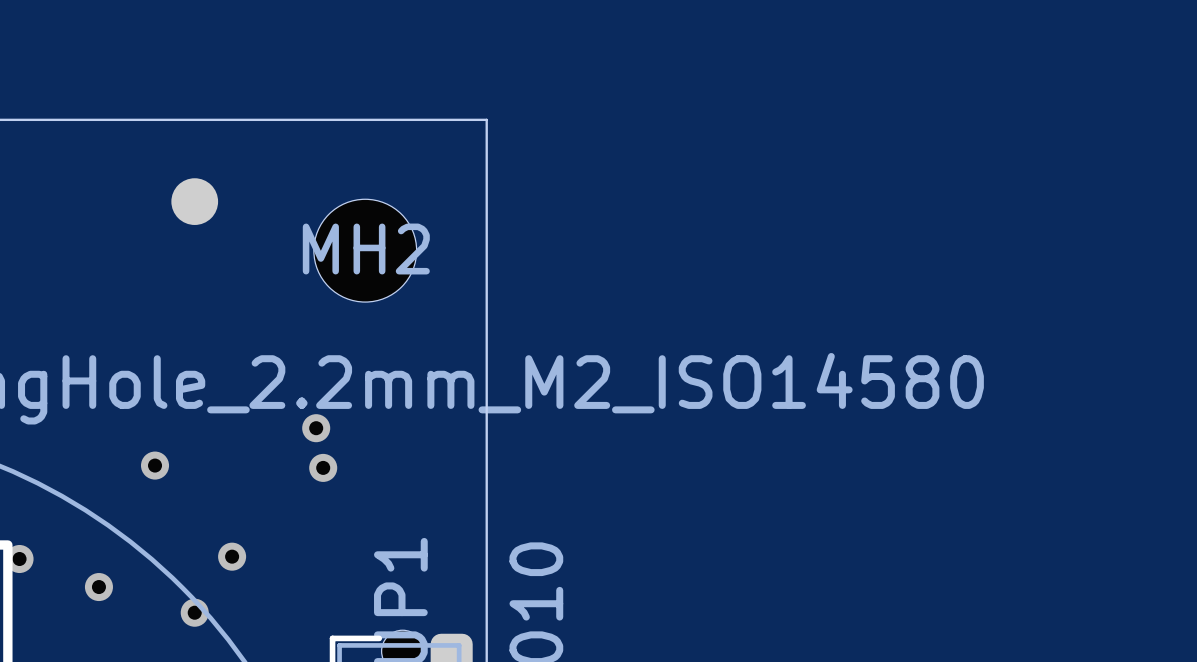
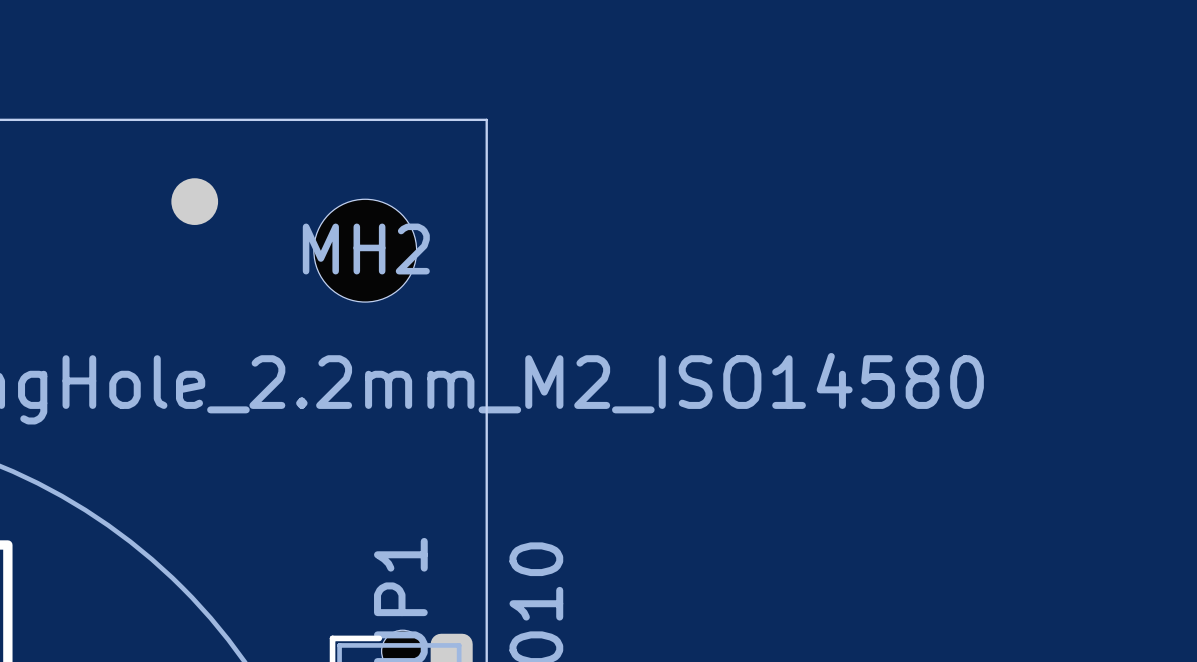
via: (316, 428) -> none
via: (155, 465) -> none
via: (323, 467) -> none
via: (232, 556) -> none
via: (19, 559) -> none
via: (98, 587) -> none
via: (194, 612) -> none

